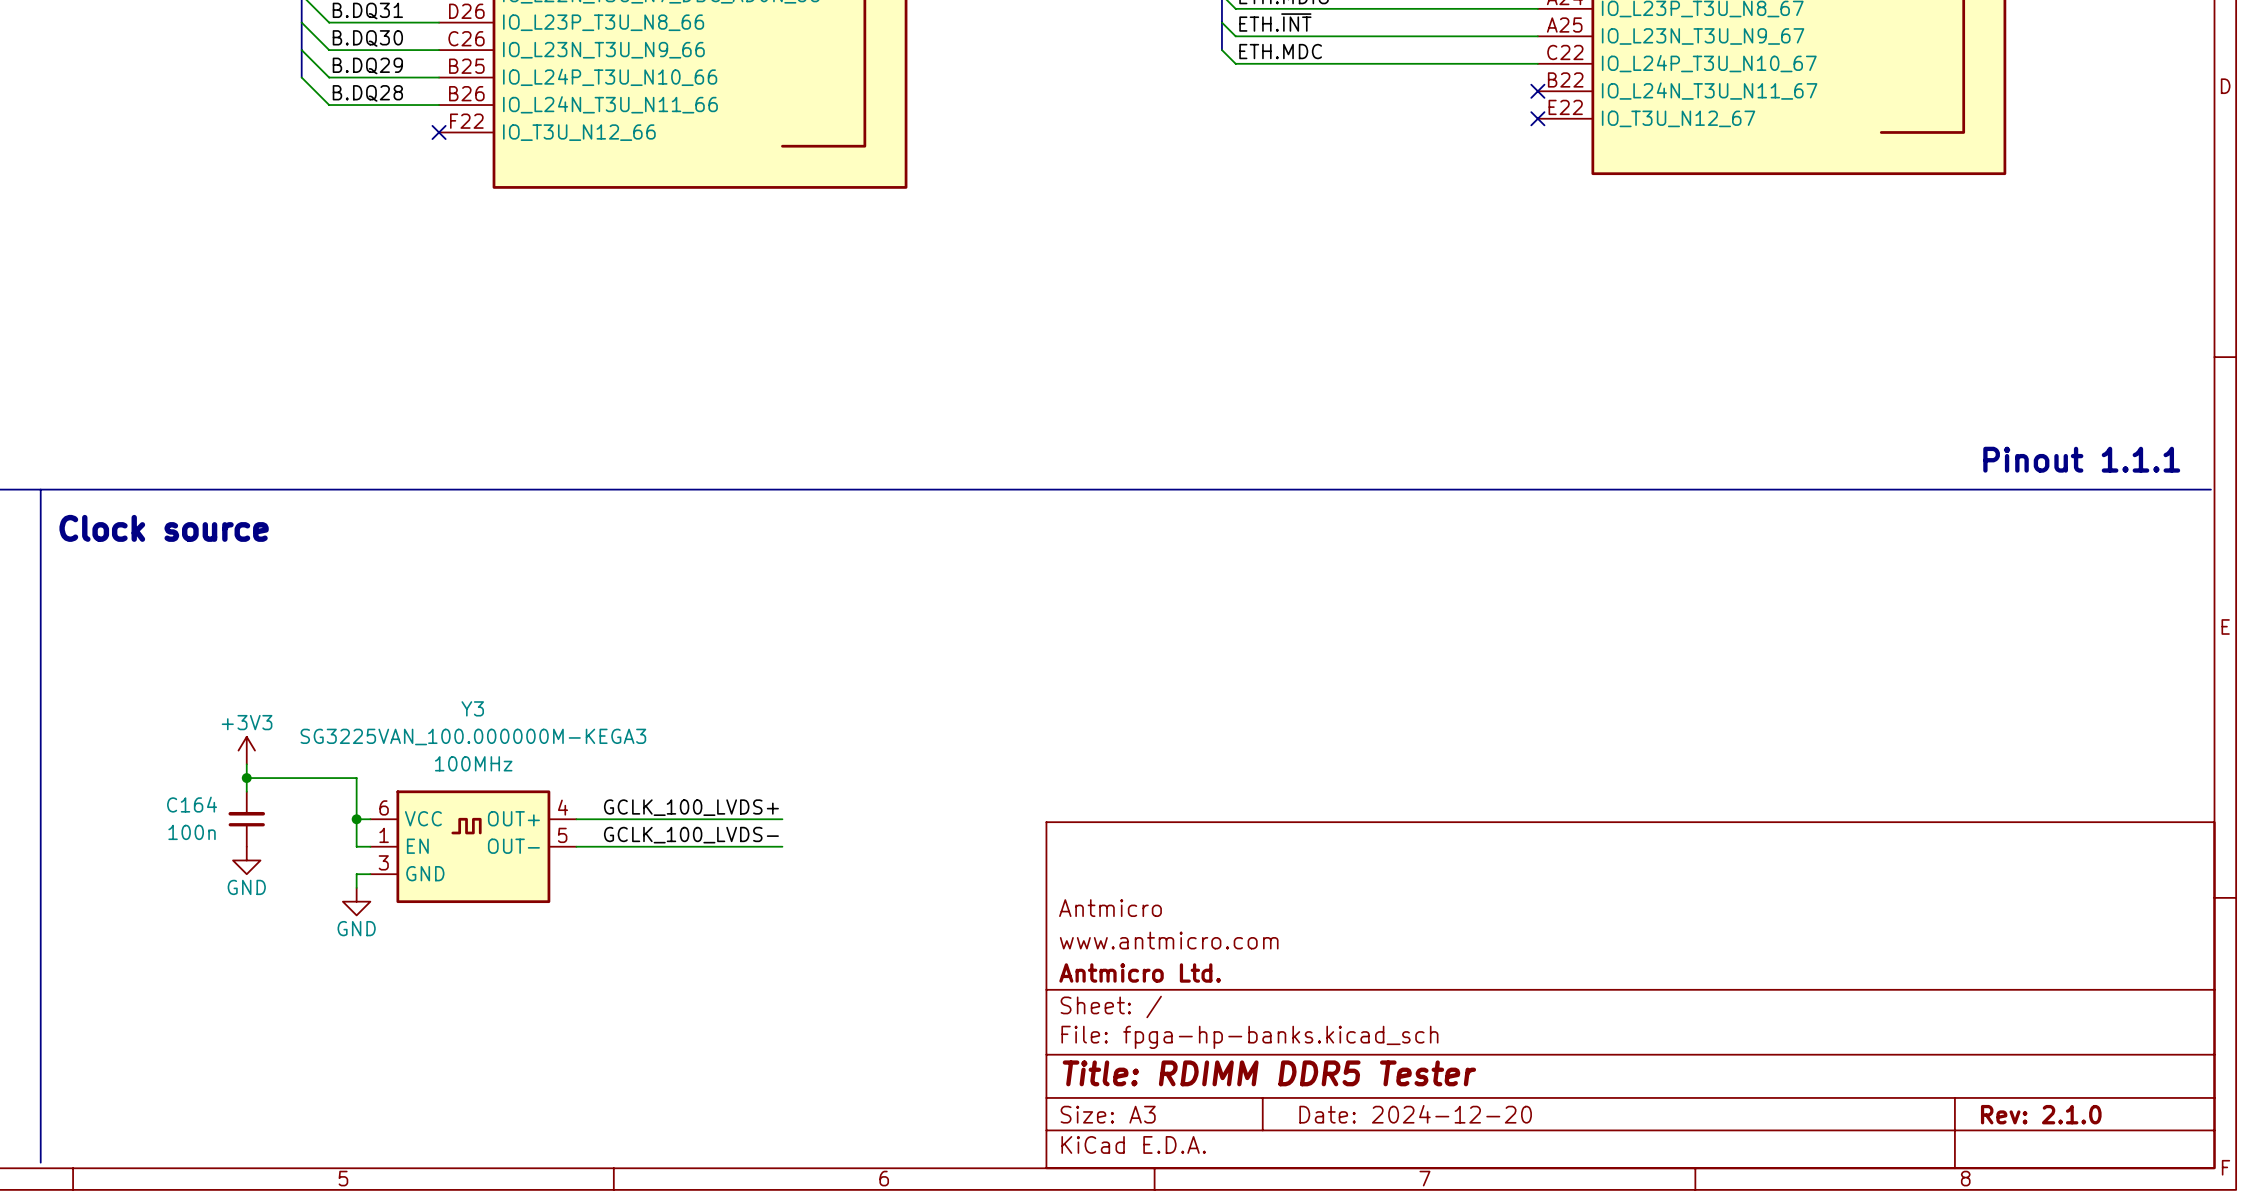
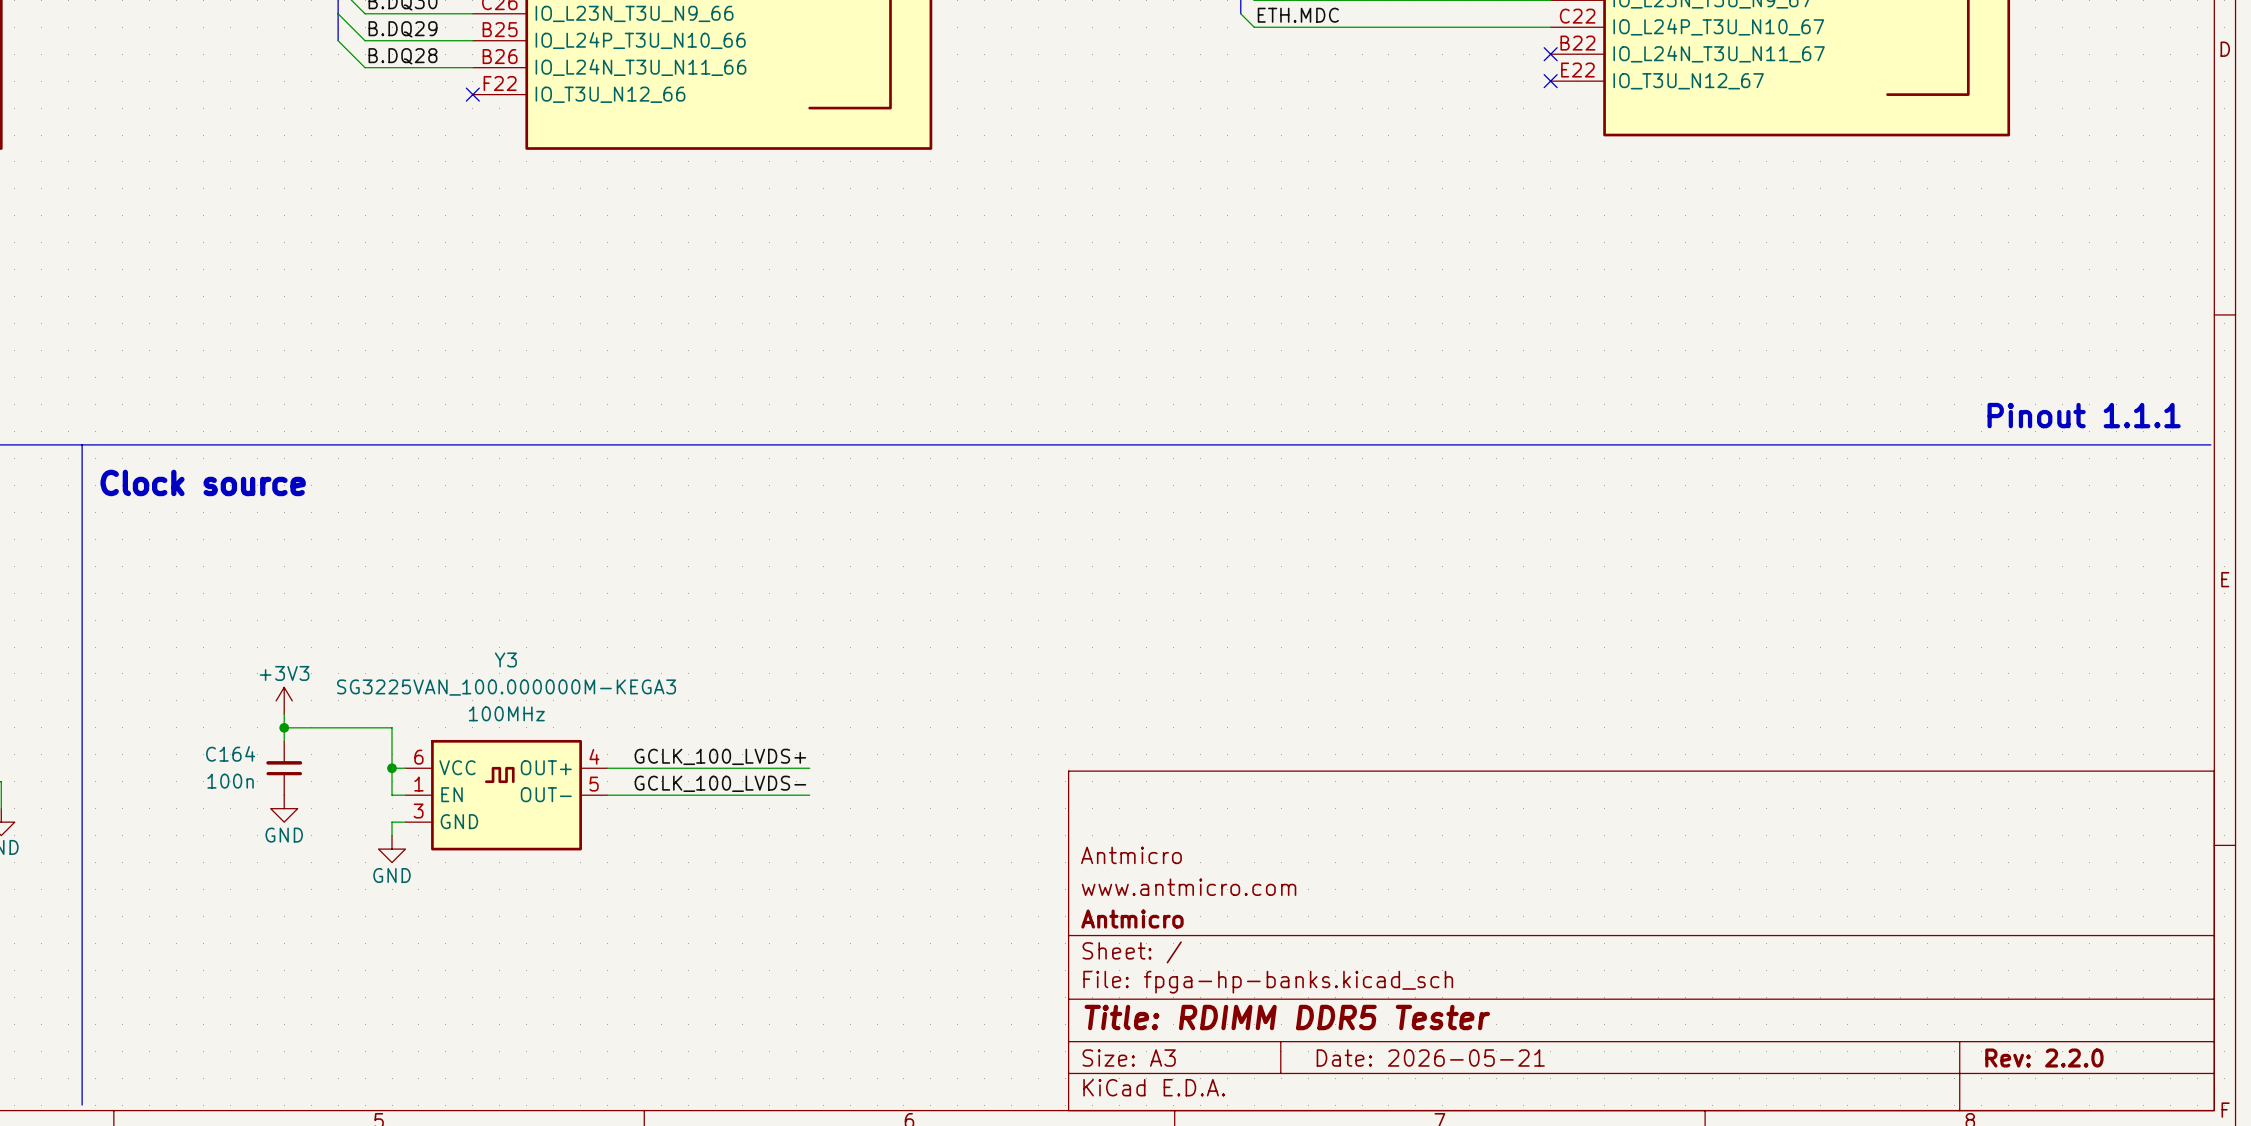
title block: Antmicro Ltd. (1140, 972) -> Antmicro (1132, 919)
title block: Date: 2024-12-20 (1415, 1114) -> Date: 2026-05-21 (1430, 1058)
title block: Rev: 2.1.0 (2041, 1114) -> Rev: 2.2.0 (2044, 1058)

